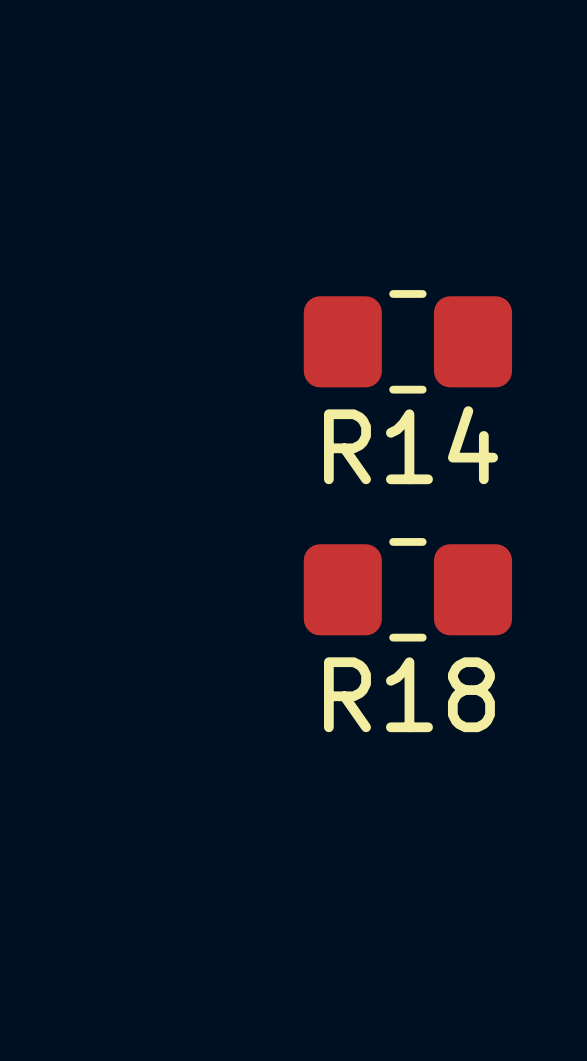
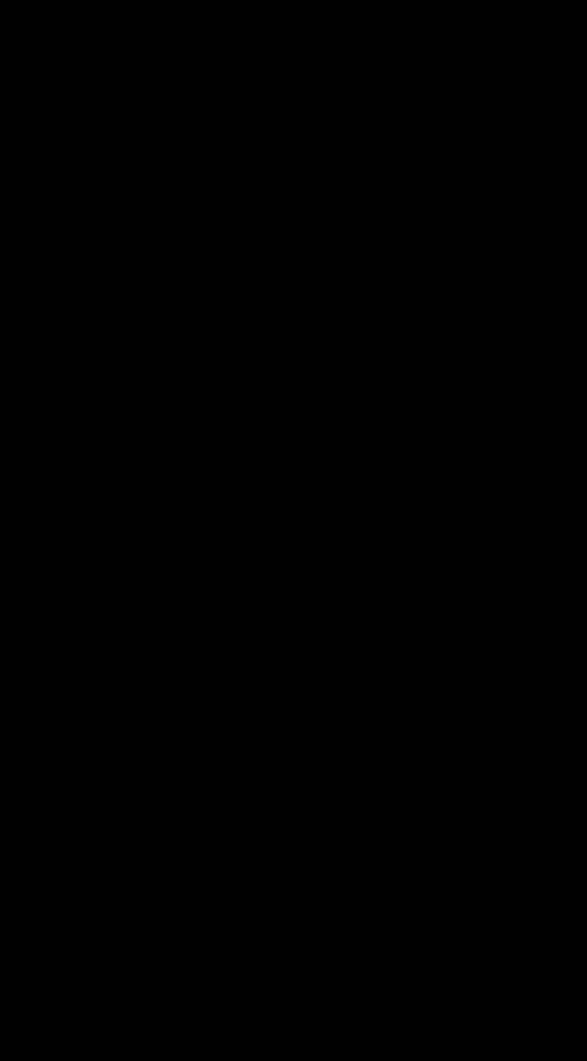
R14: (407, 341) -> none
R18: (407, 589) -> none

